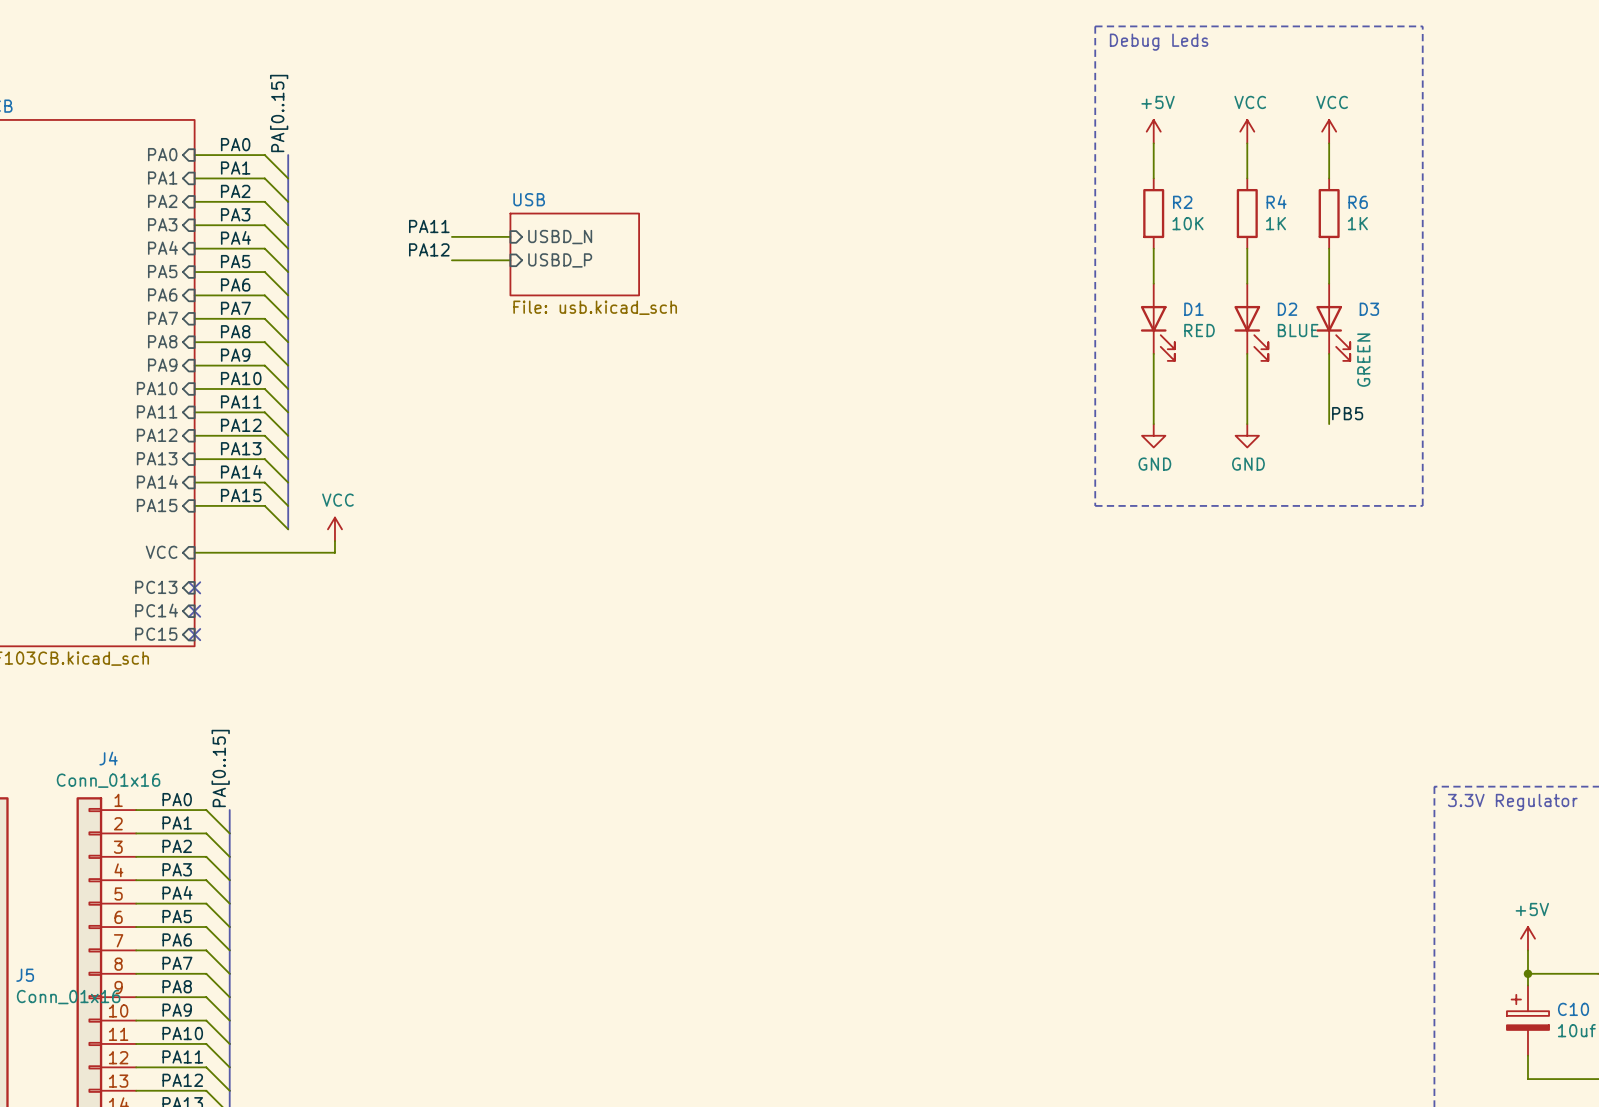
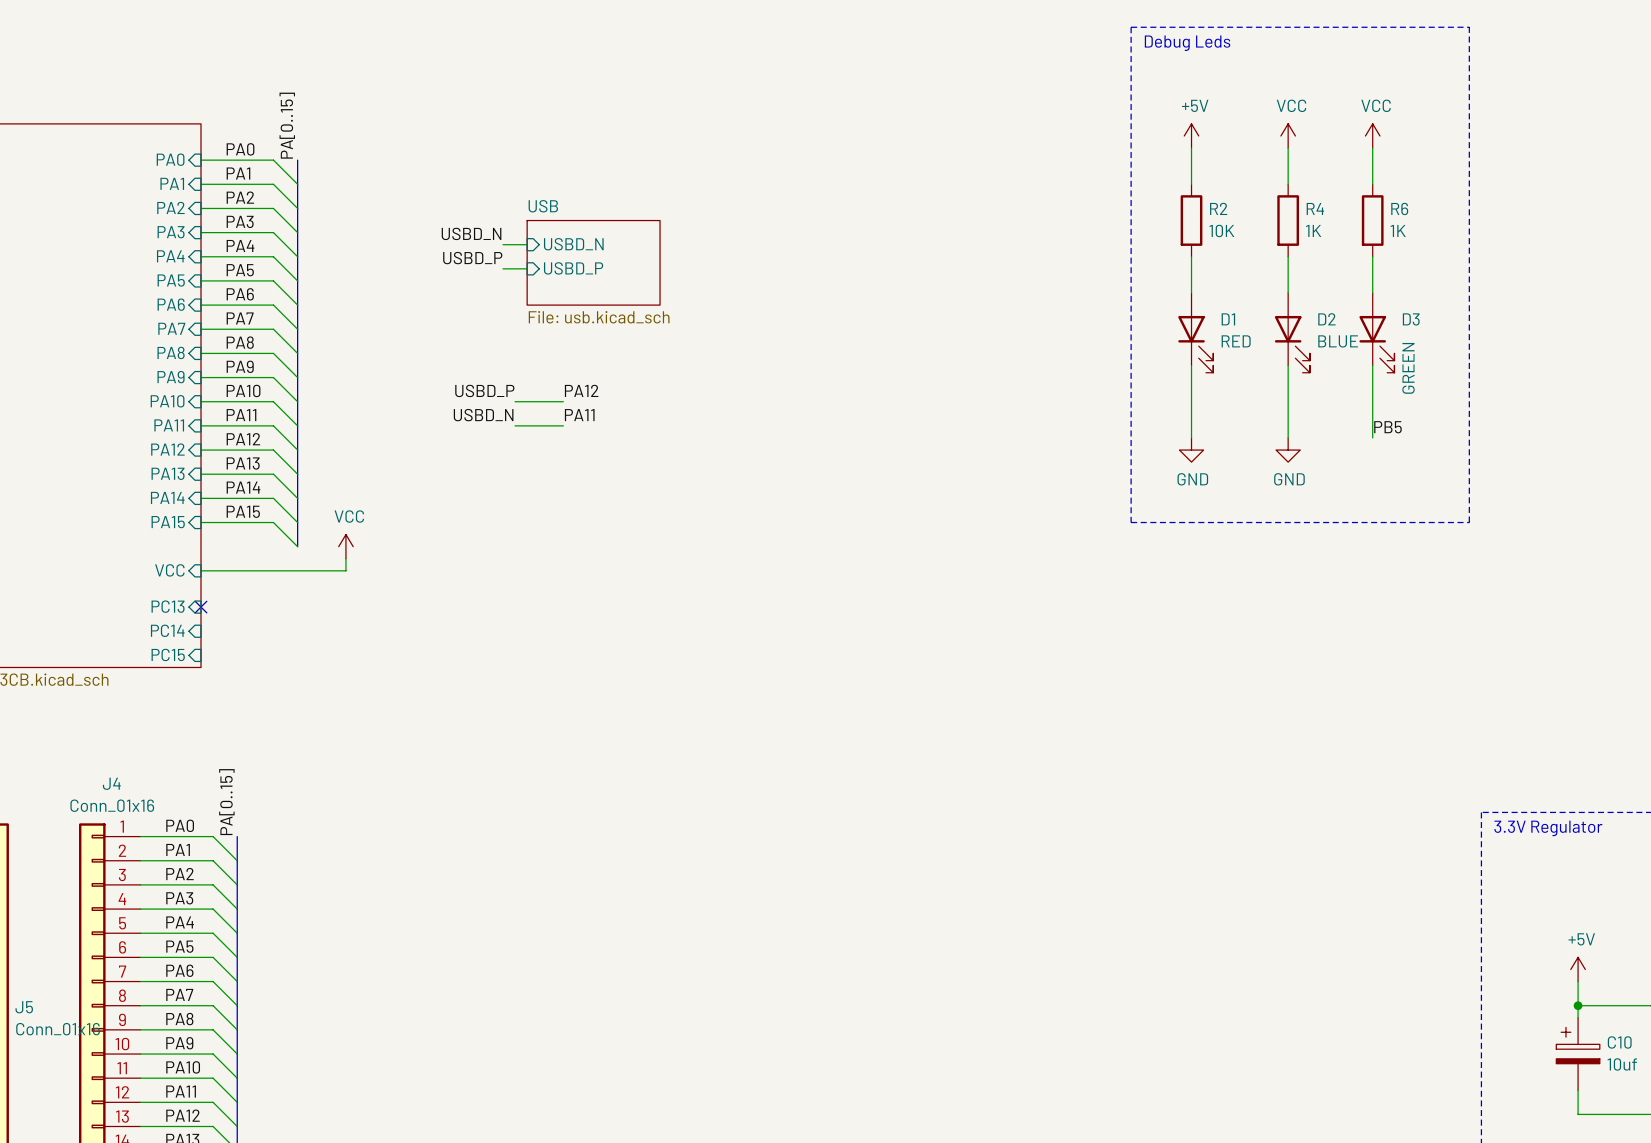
label position: PA11 (429, 226) -> PA11 (579, 415)
label: none -> USBD_N (471, 233)
wire: (451, 236) (487, 236) -> none
label position: PA12 (429, 249) -> PA12 (581, 390)
label: none -> USBD_P (472, 258)
wire: (451, 260) (487, 260) -> none
label: none -> USBD_P (484, 390)
wire: none -> (515, 401) (563, 401)
label: none -> USBD_N (483, 415)
wire: none -> (515, 425) (563, 425)
no-connect mark: (194, 611) -> none
no-connect mark: (194, 634) -> none

